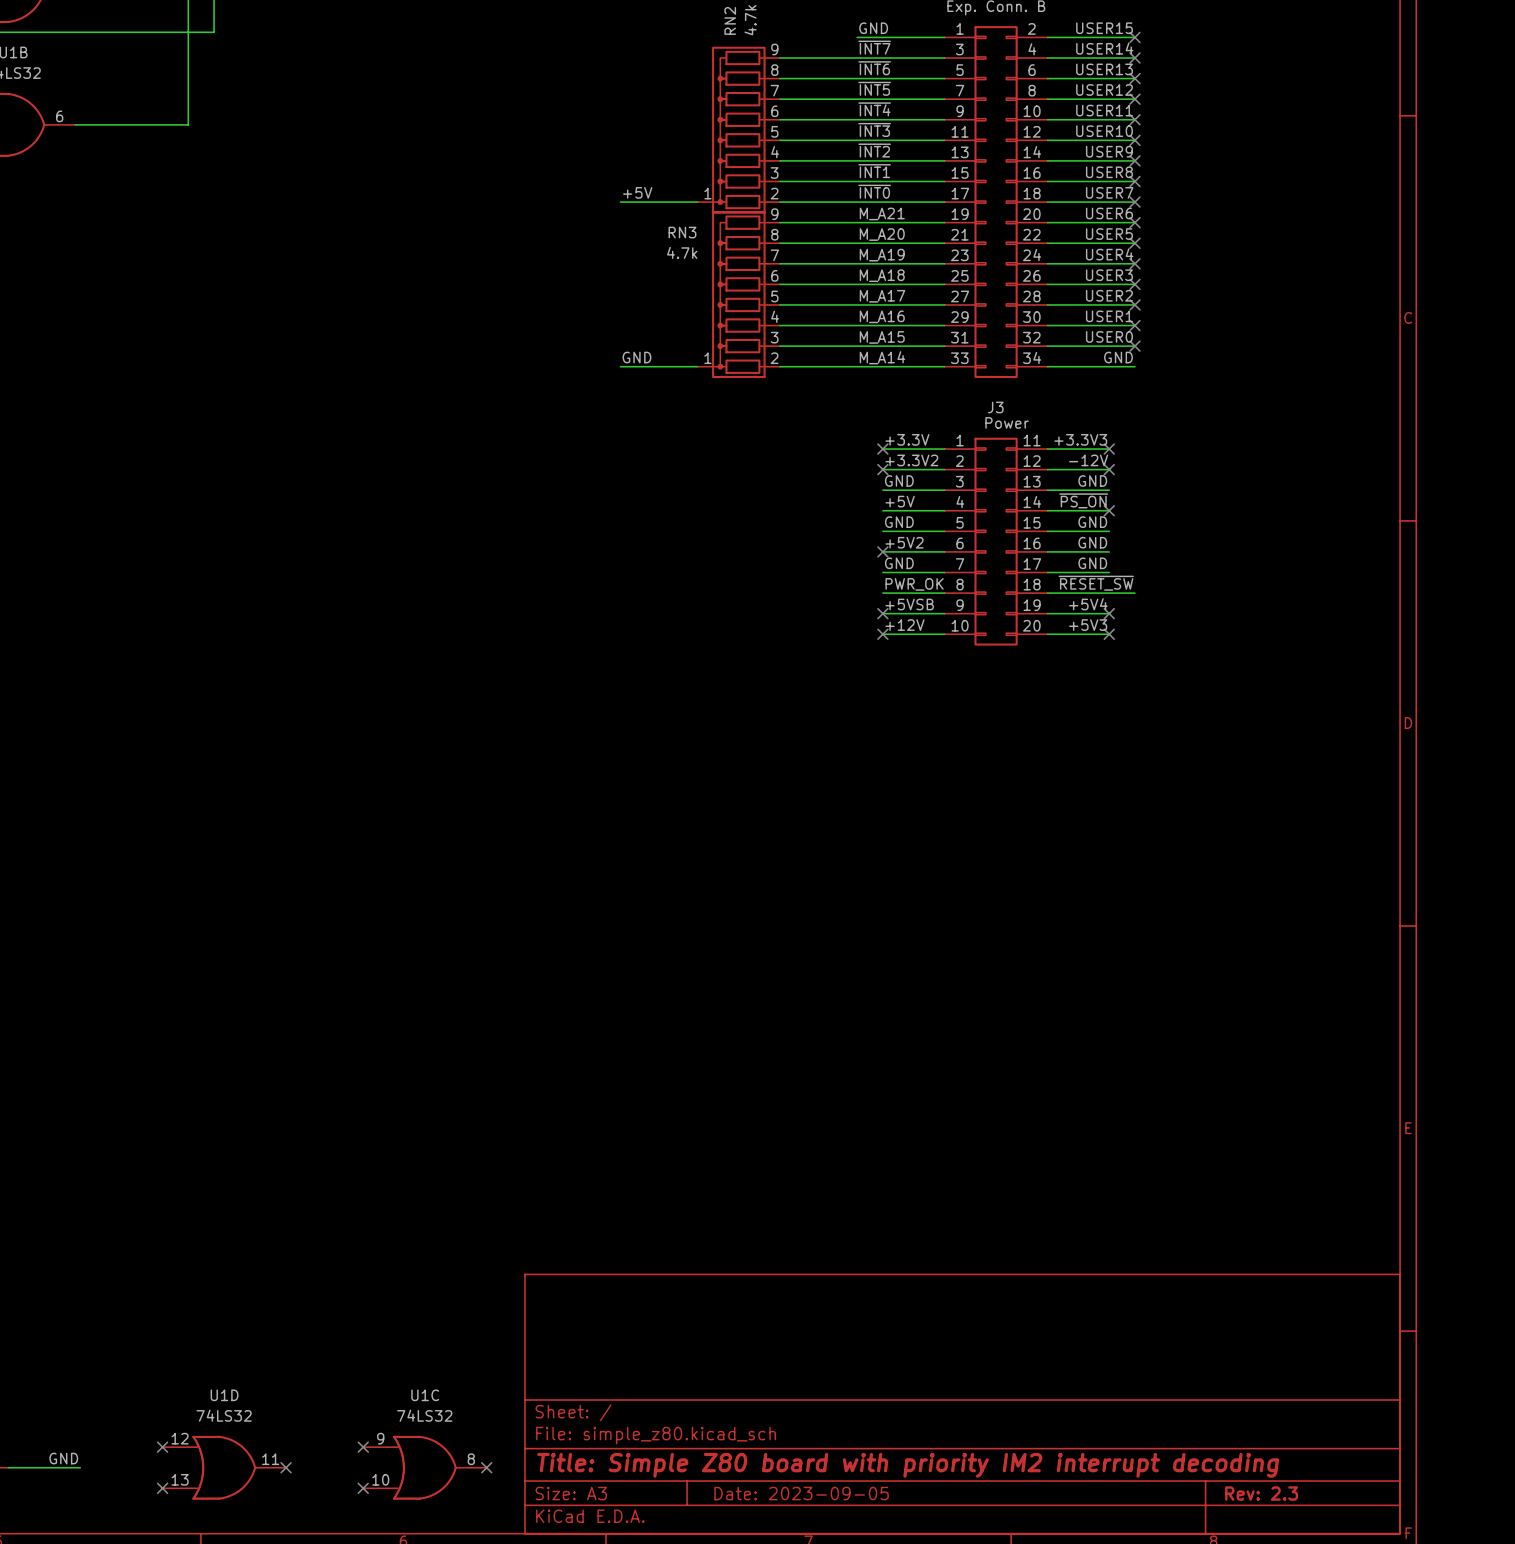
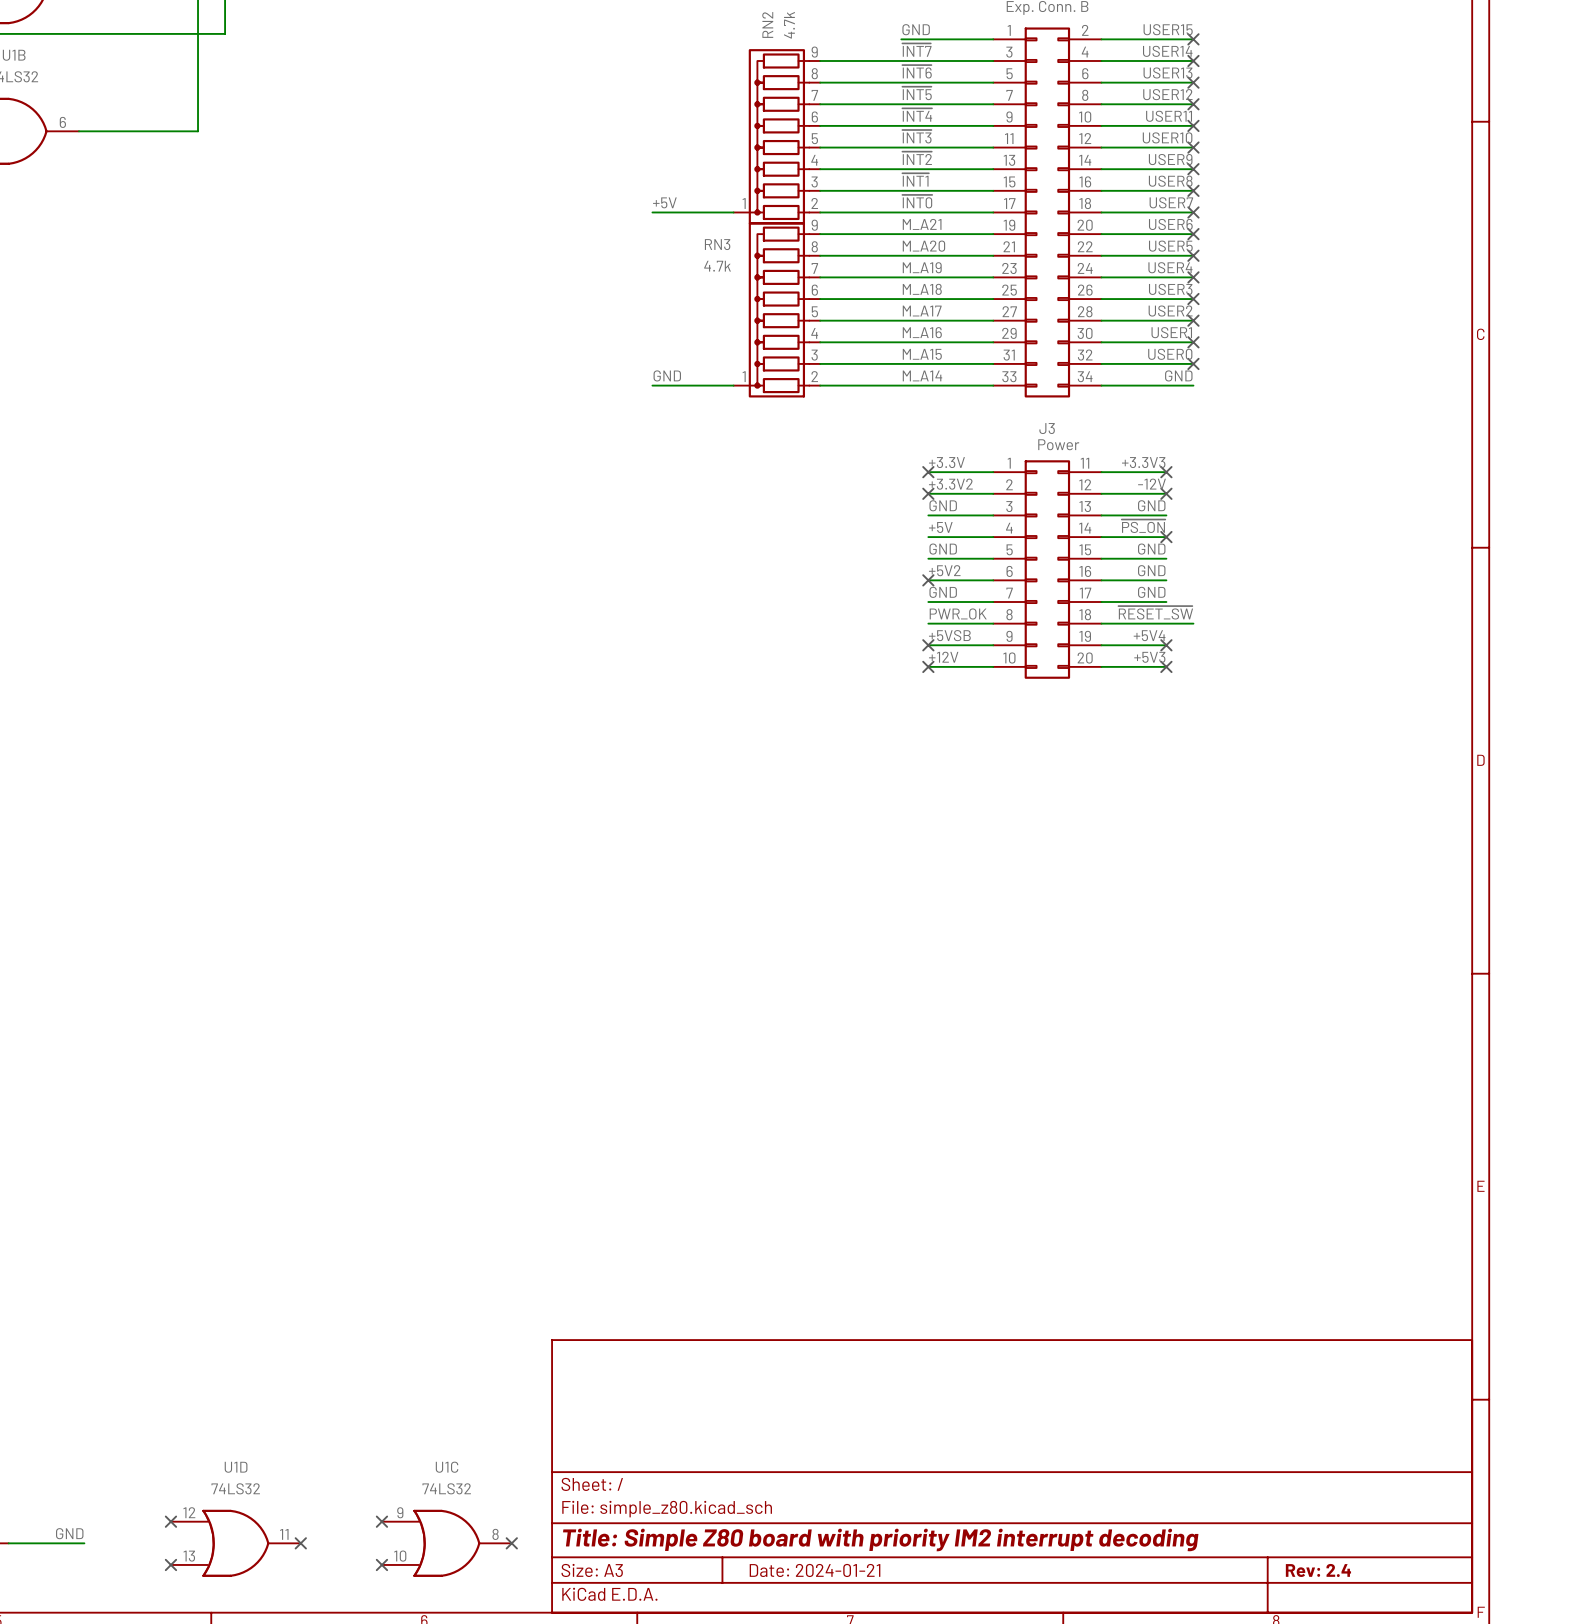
title block: Date: 2023-09-05 (801, 1493) -> Date: 2024-01-21 (815, 1570)
title block: Rev: 2.3 (1261, 1493) -> Rev: 2.4 (1318, 1570)

